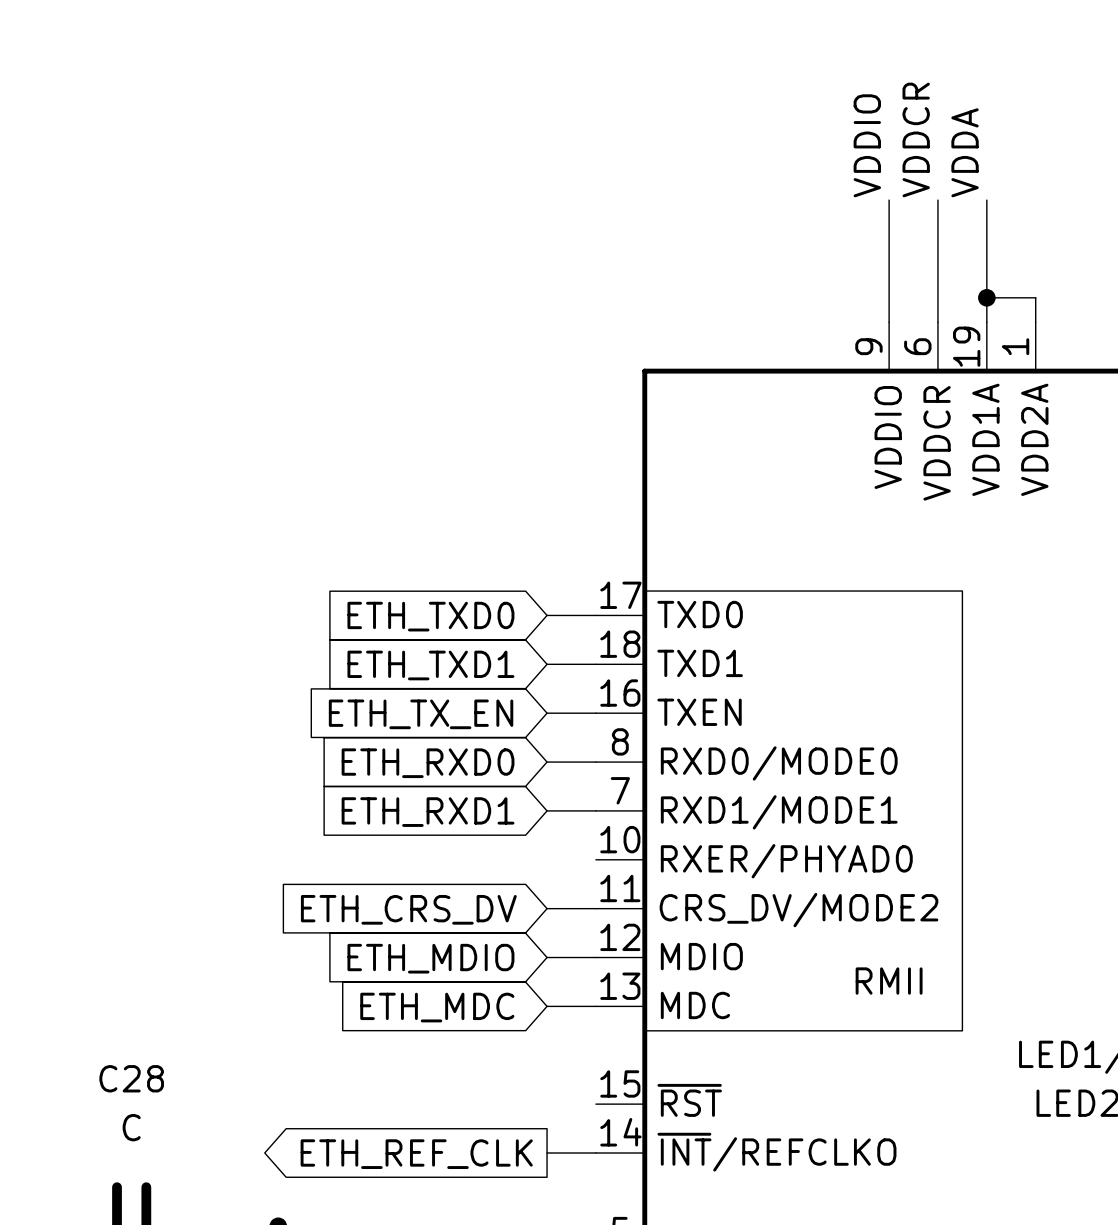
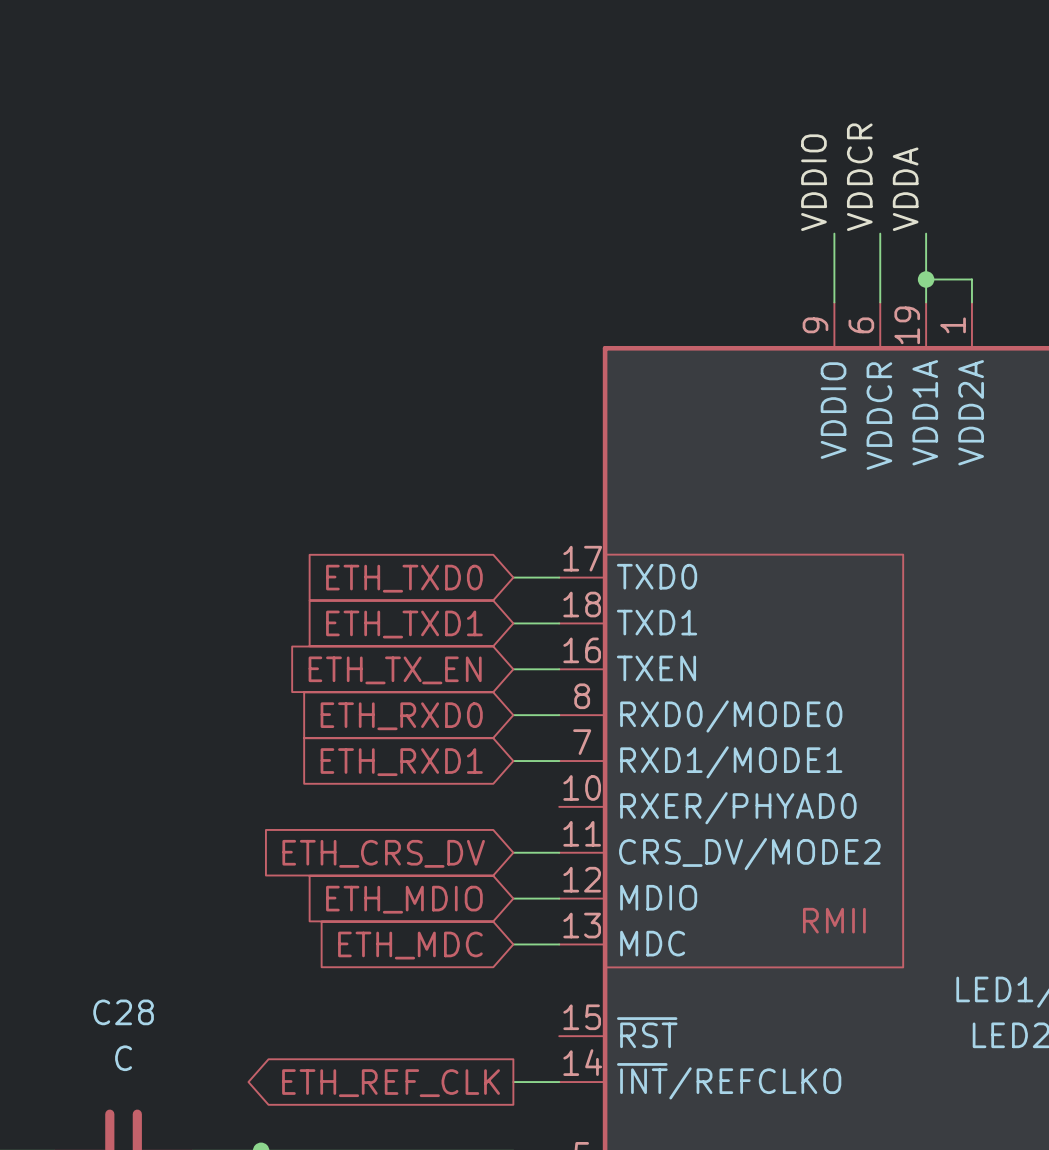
label position: VDDCR (916, 139) -> VDDCR (859, 177)
label position: VDDIO (867, 145) -> VDDIO (813, 182)
label position: VDDA (965, 152) -> VDDA (905, 189)
wire: (889, 200) (889, 248) -> none
wire: (937, 200) (937, 248) -> none
wire: (986, 200) (986, 248) -> none

